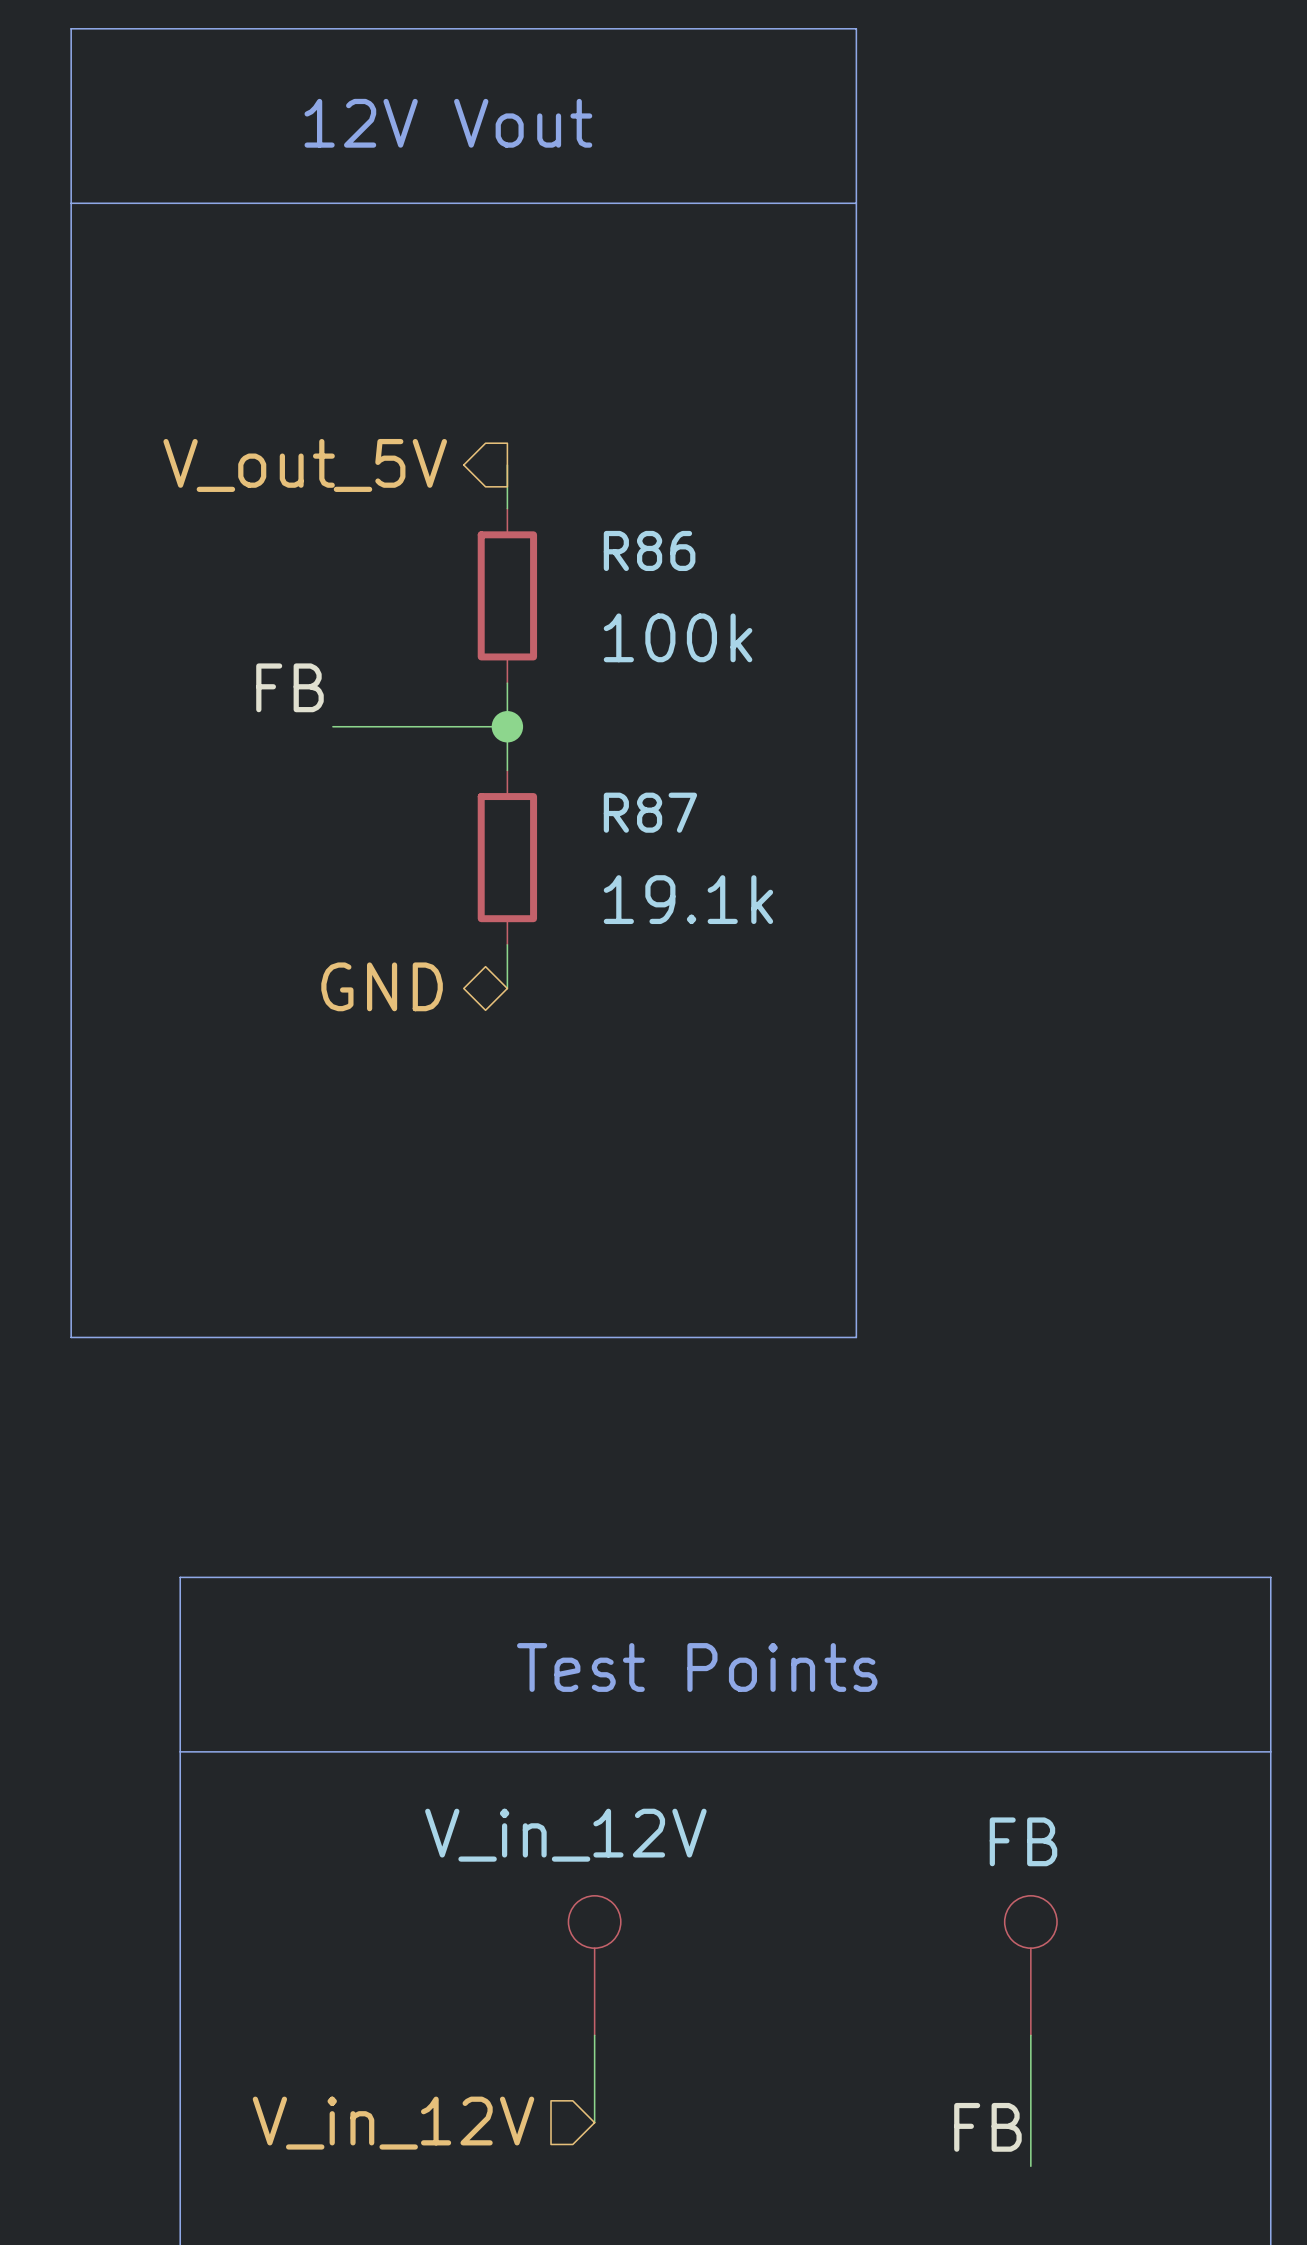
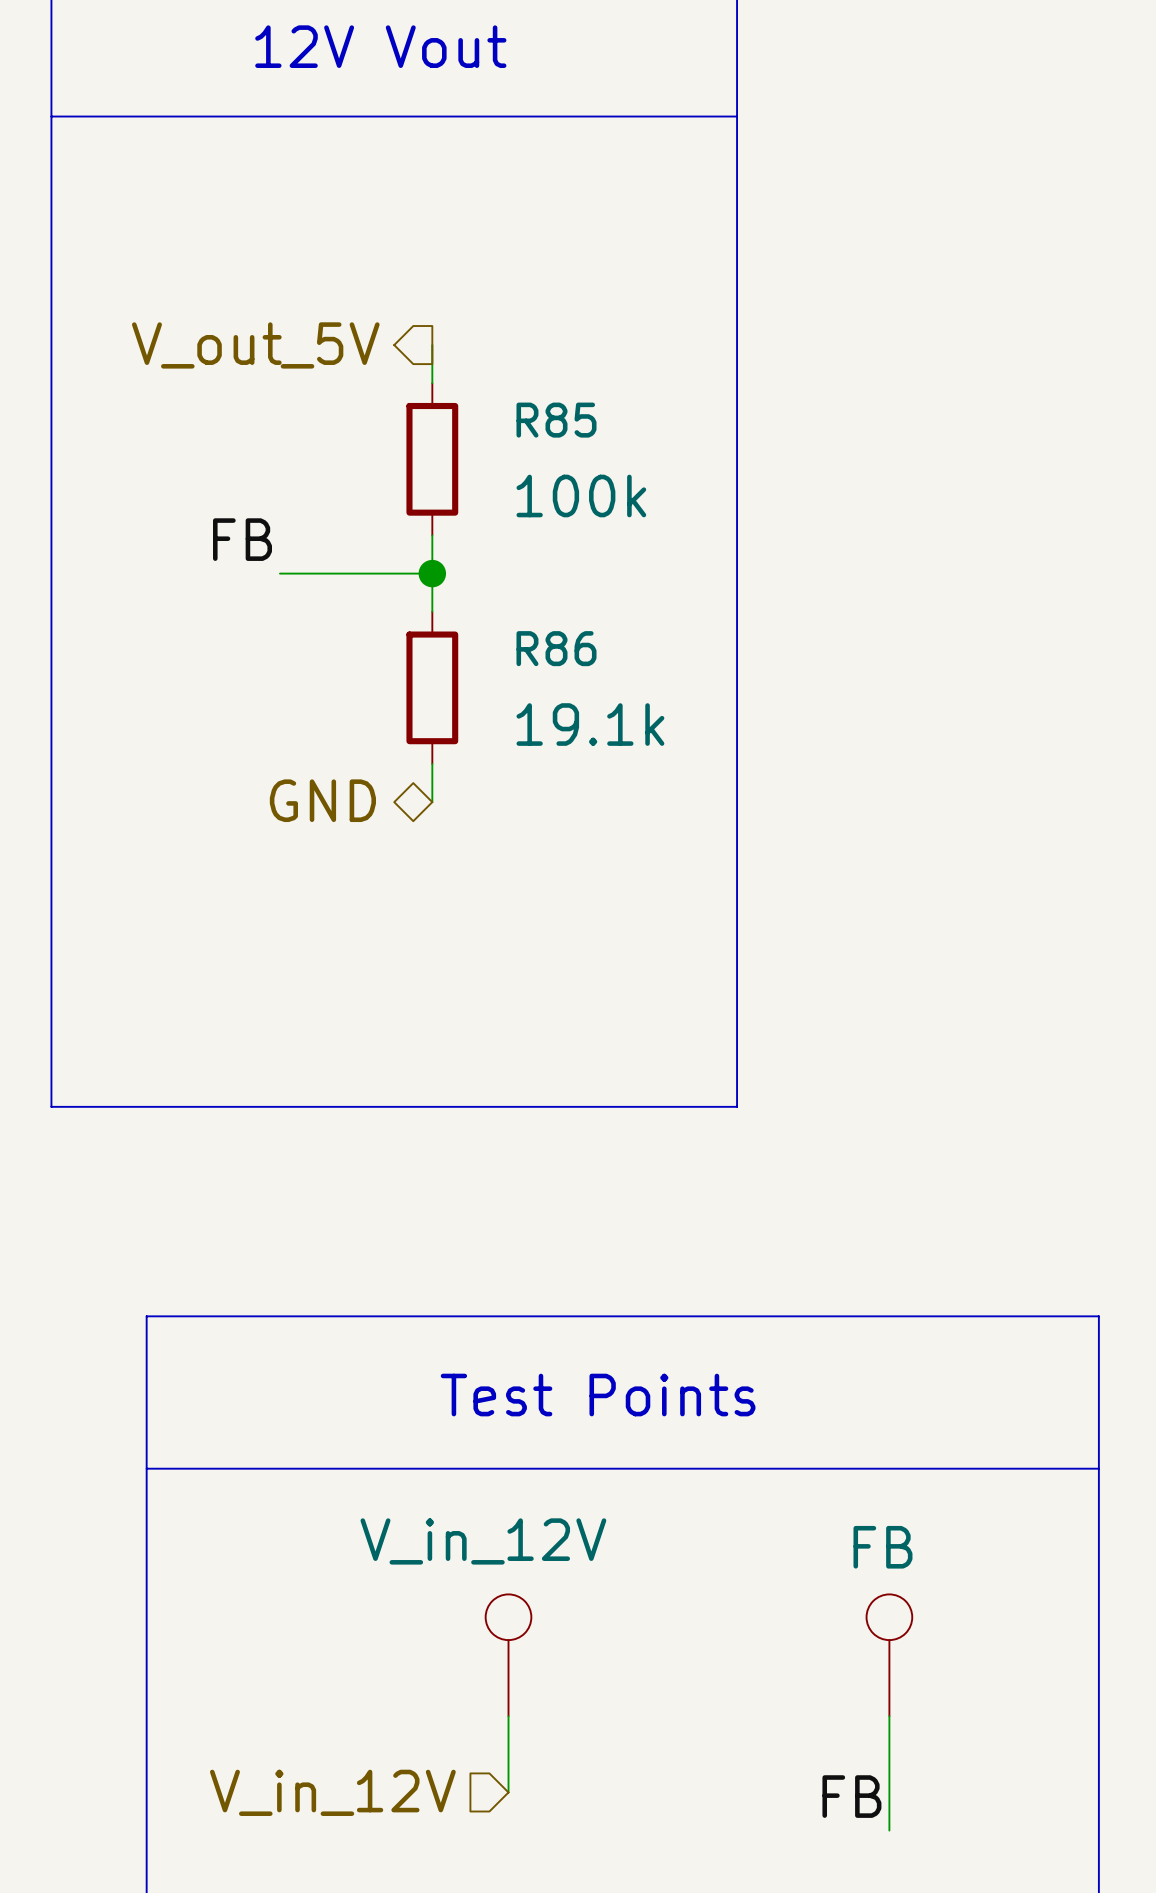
R86 name: R86 (649, 550) -> R85 (556, 420)
R87 name: R87 (650, 812) -> R86 (556, 648)

